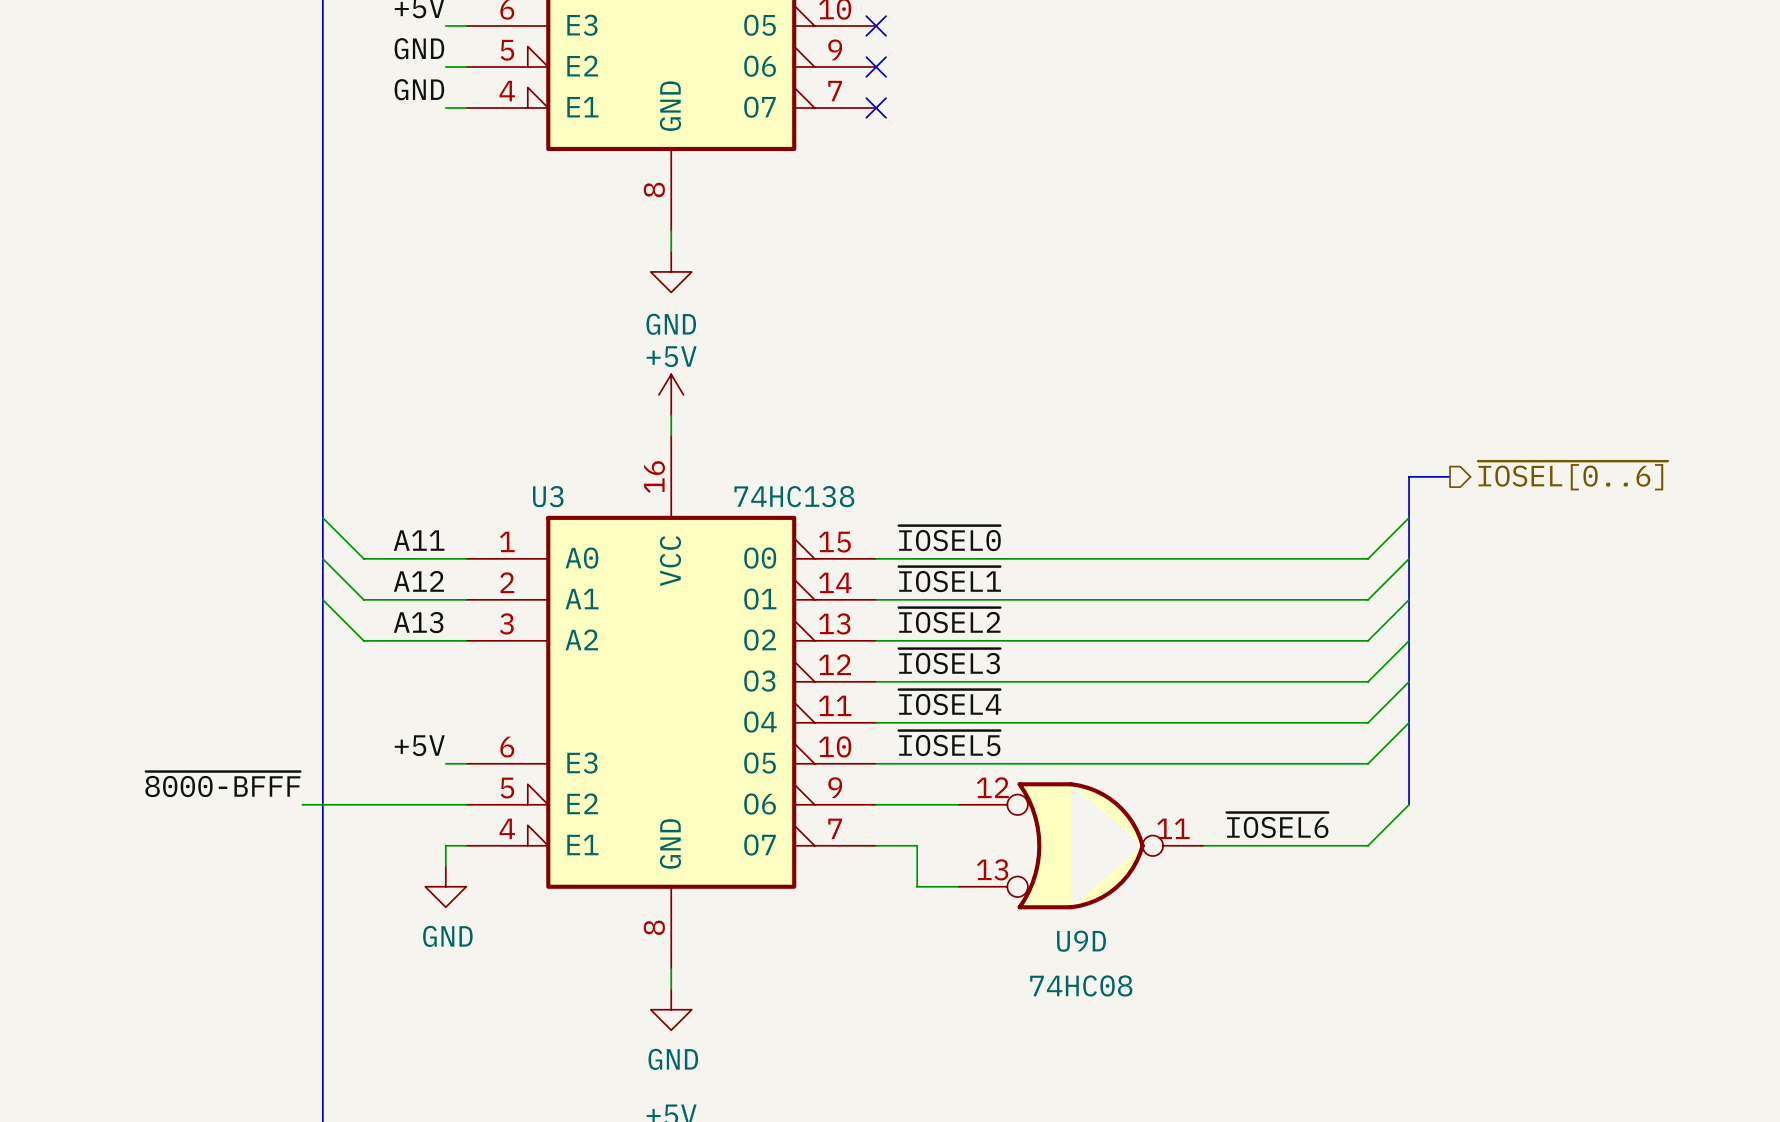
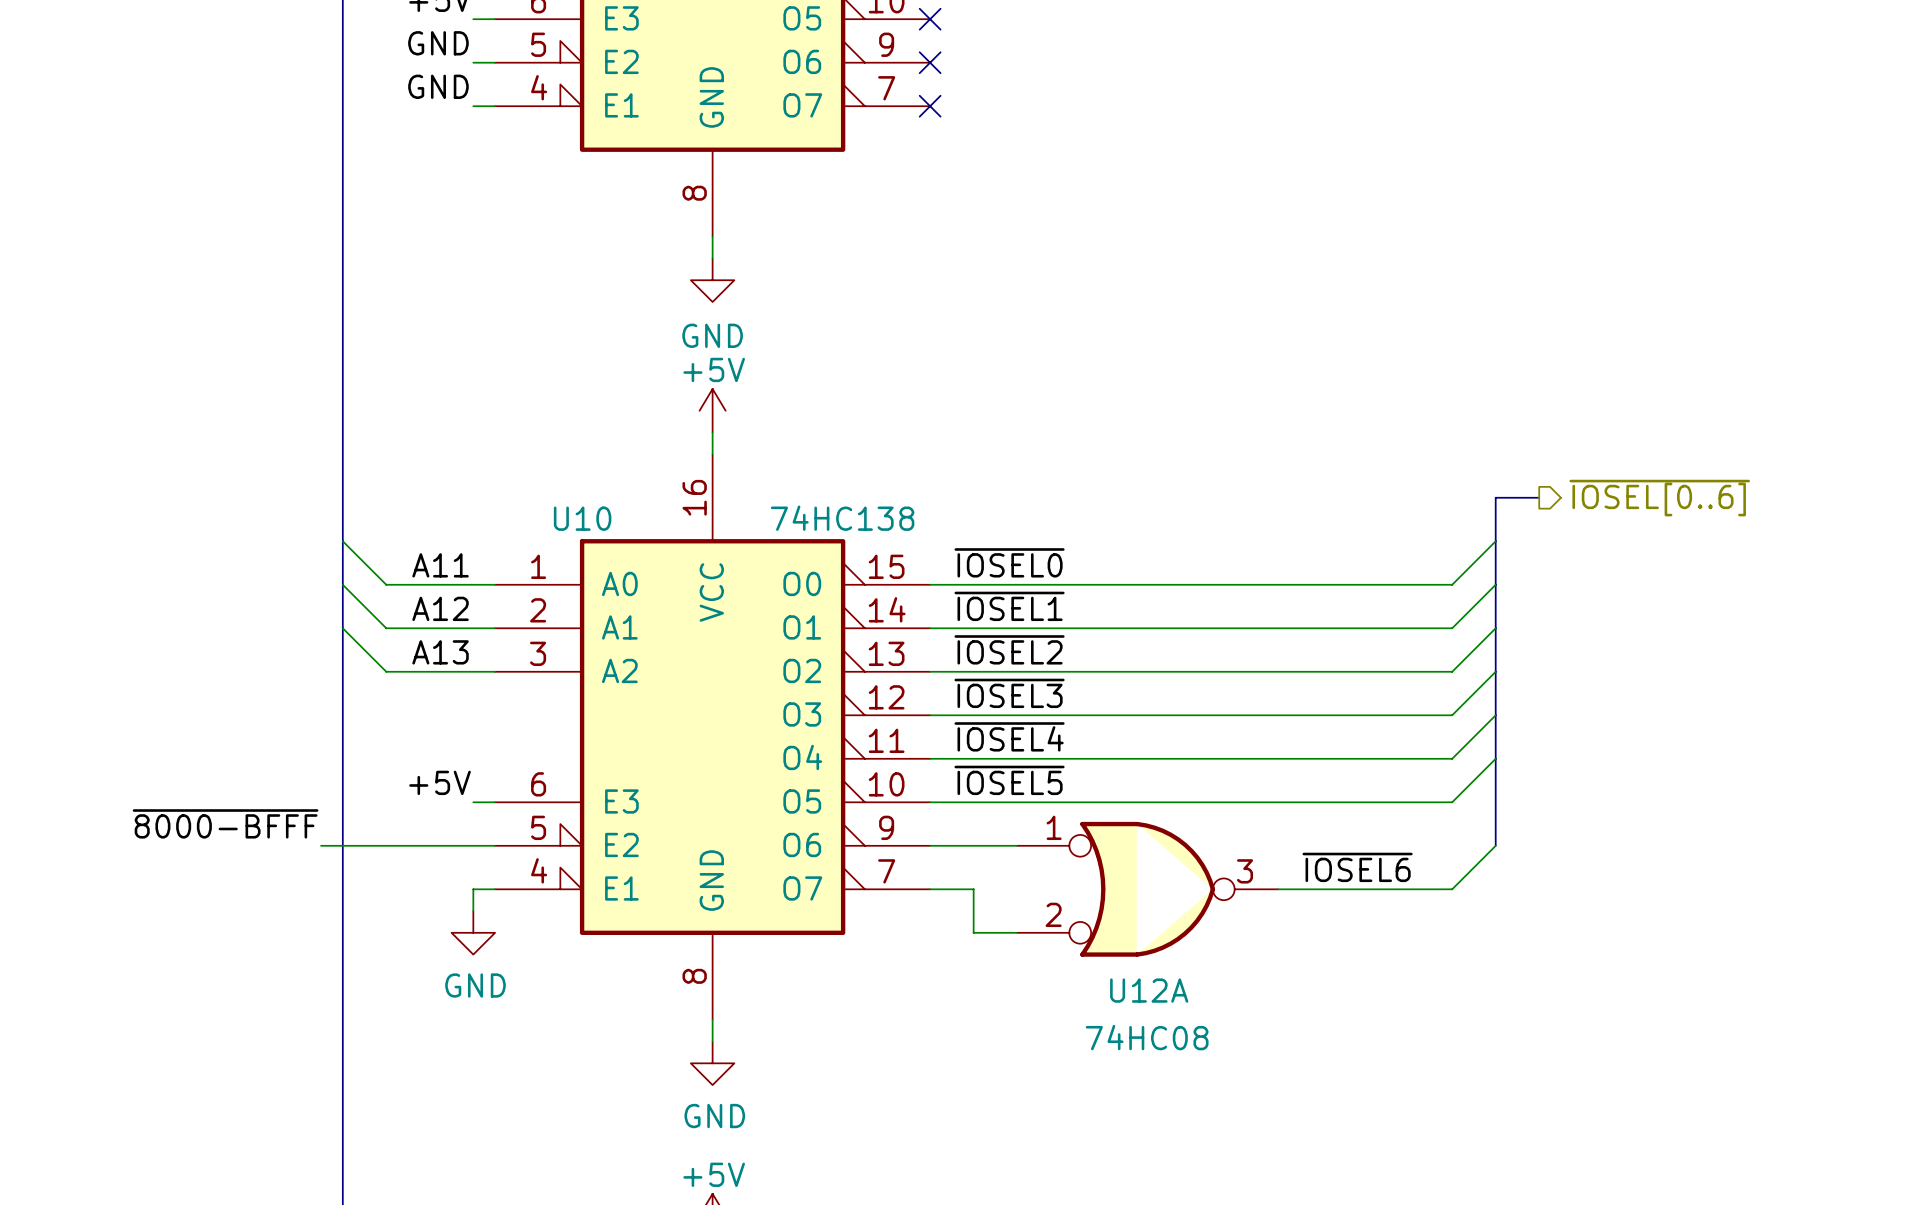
U3 name: U3 (548, 496) -> U10 (582, 518)
U9D pin number: 12 (992, 787) -> 1 (1054, 827)
U9D pin number: 11 (1173, 828) -> 3 (1245, 871)
U9D pin number: 13 (992, 869) -> 2 (1053, 914)
U9D name: U9D (1081, 941) -> U12A (1149, 990)

